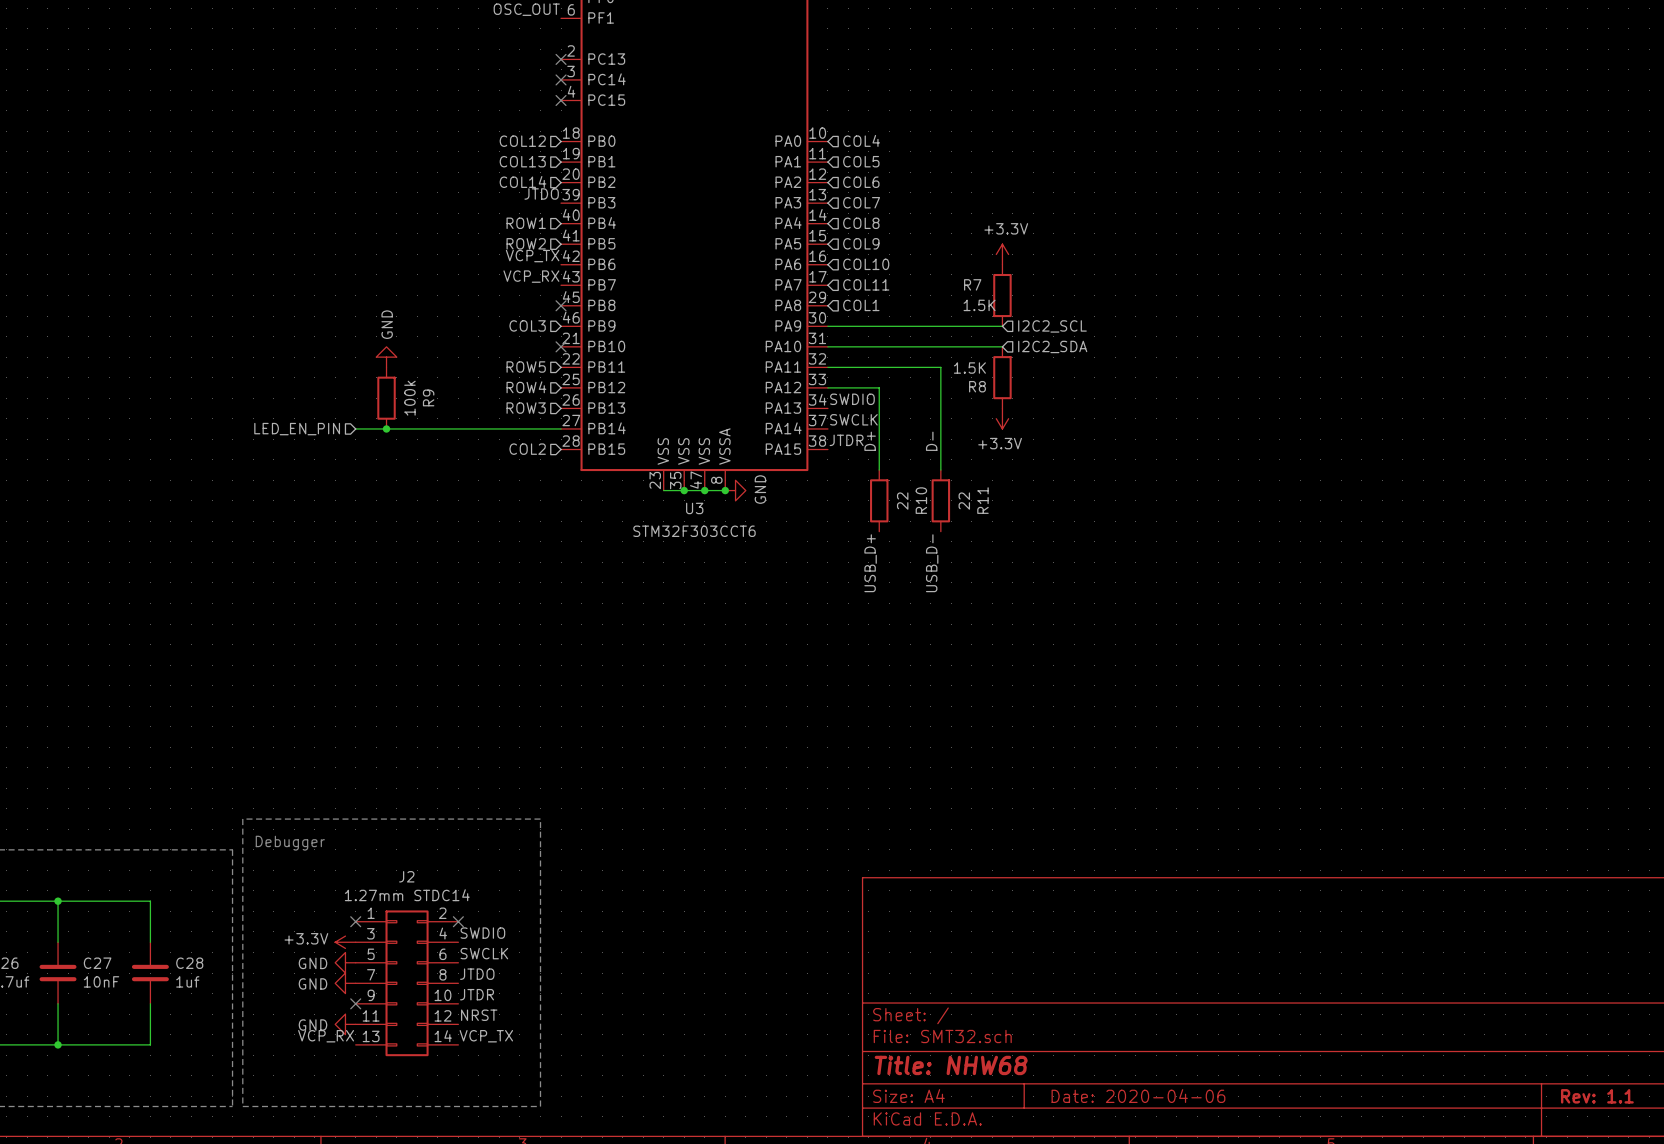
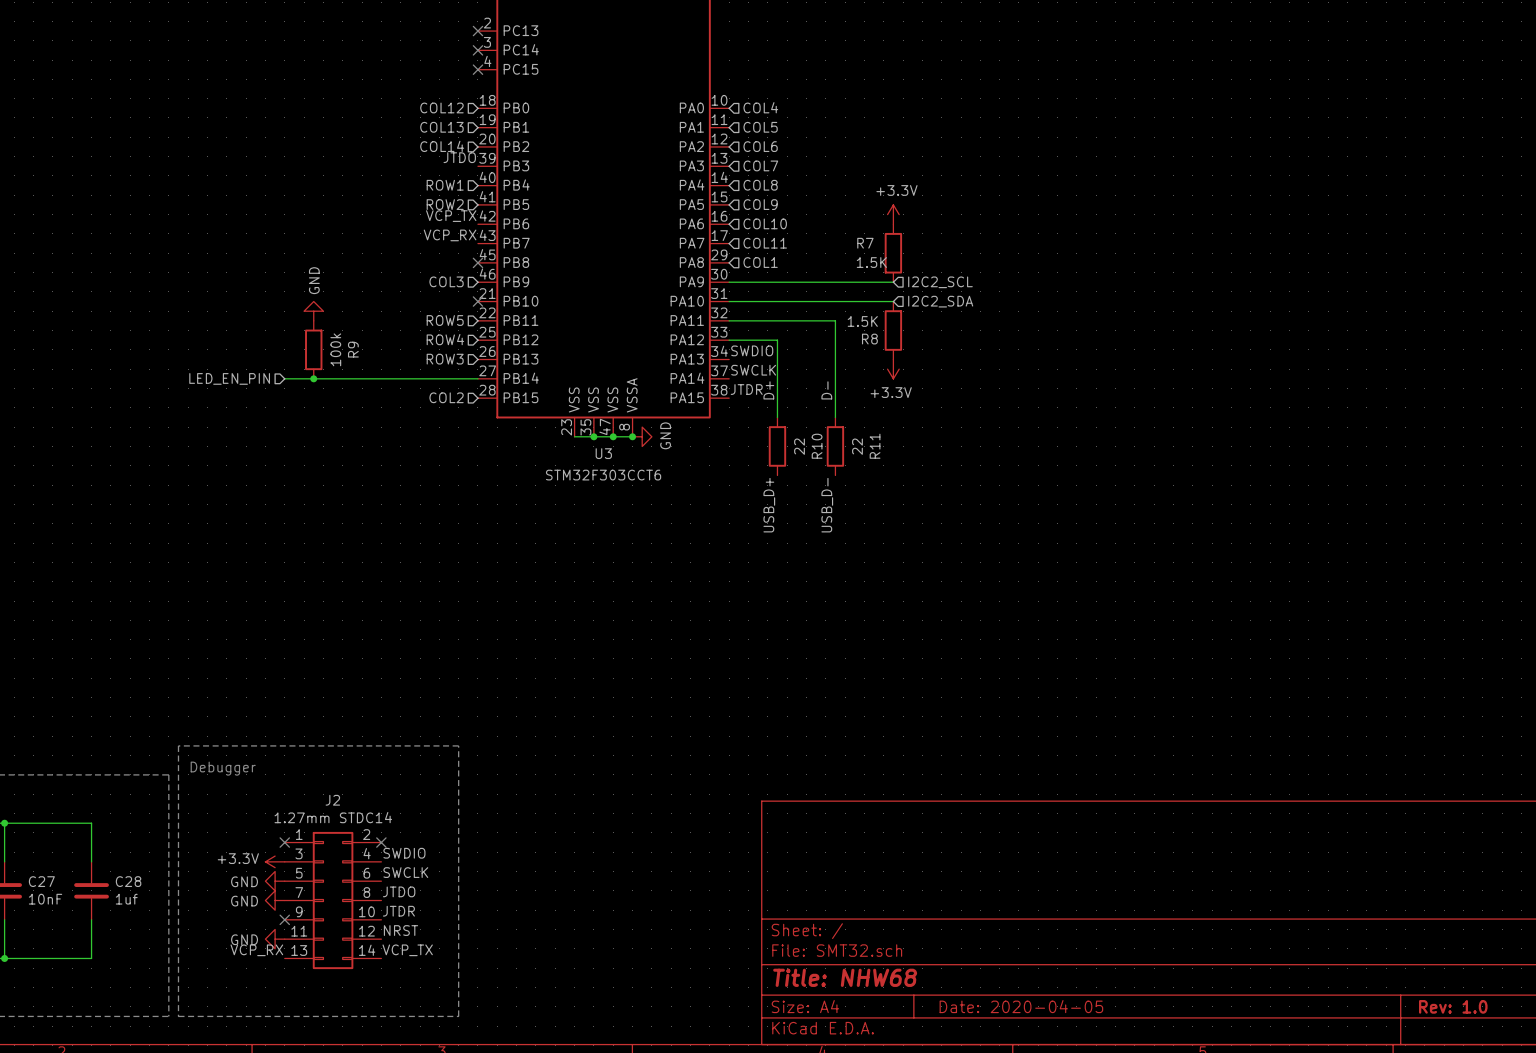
title block: Date: 2020-04-06 (1138, 1096) -> Date: 2020-04-05 (1021, 1006)
title block: Rev: 1.1 (1597, 1096) -> Rev: 1.0 (1453, 1006)

